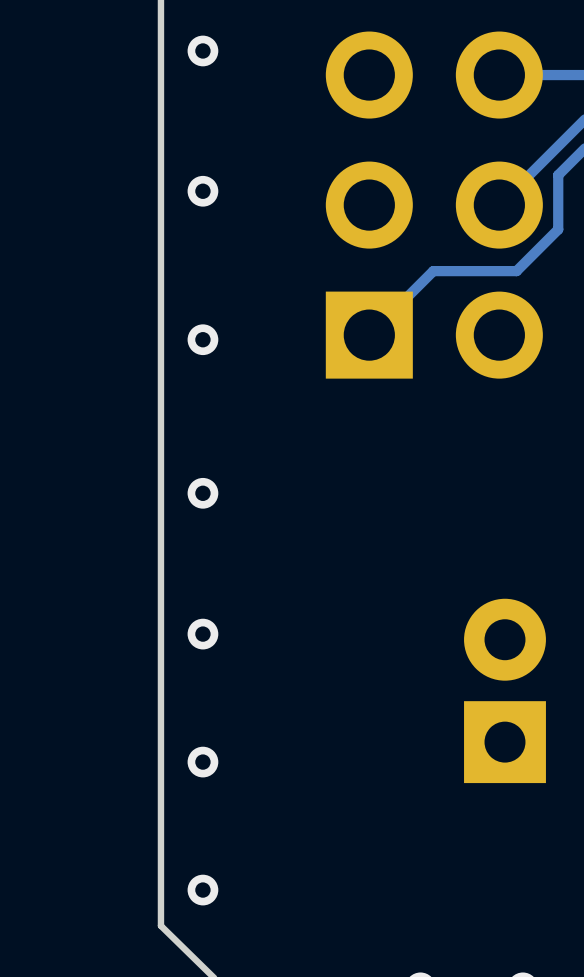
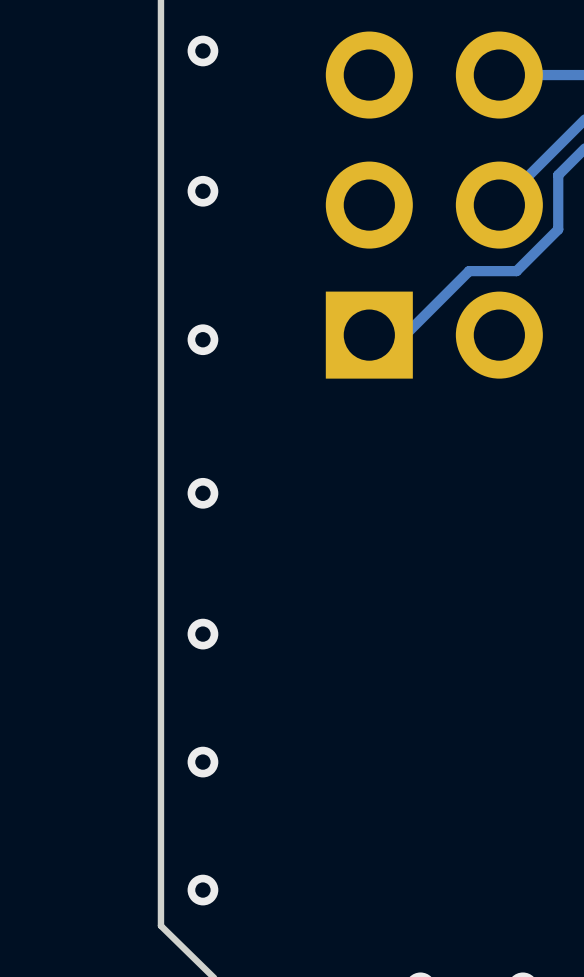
track: (469, 271) (433, 271) (369, 335) -> (469, 271) (405, 335)
part: (504, 690) -> none

